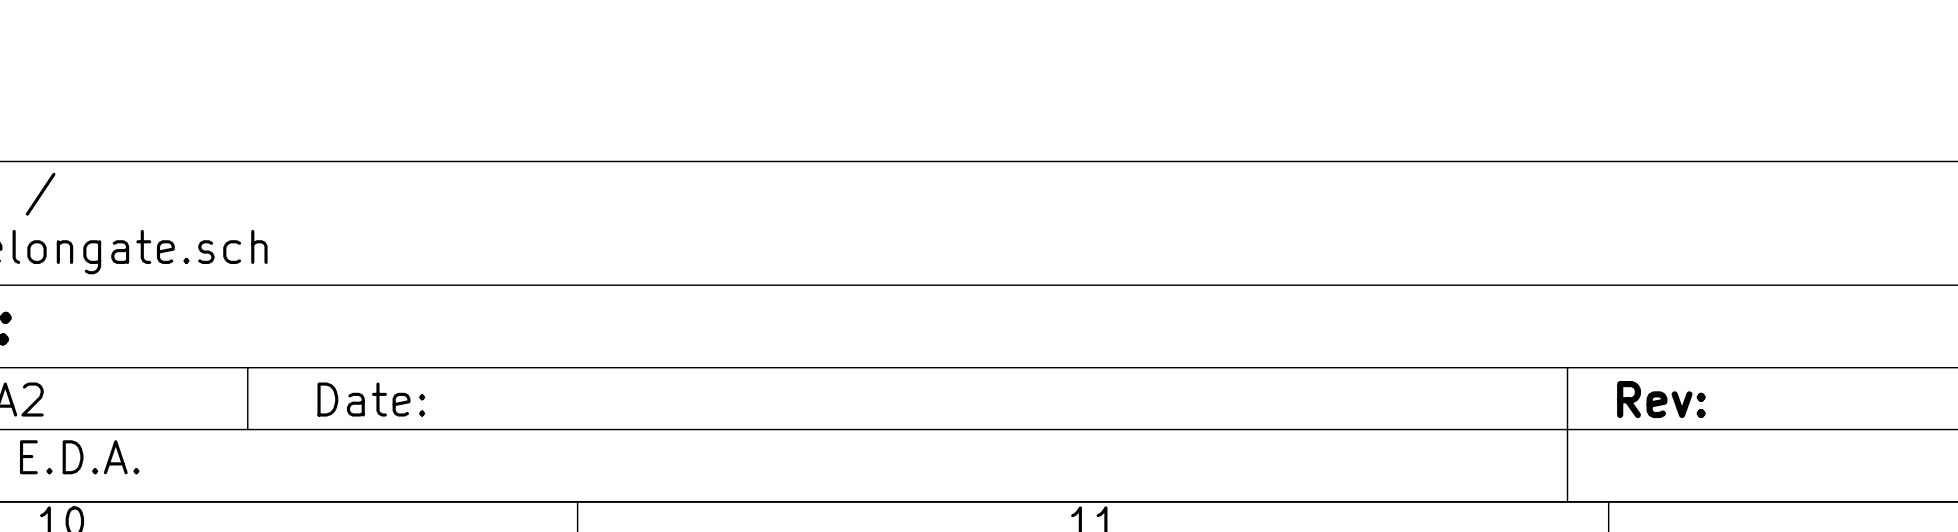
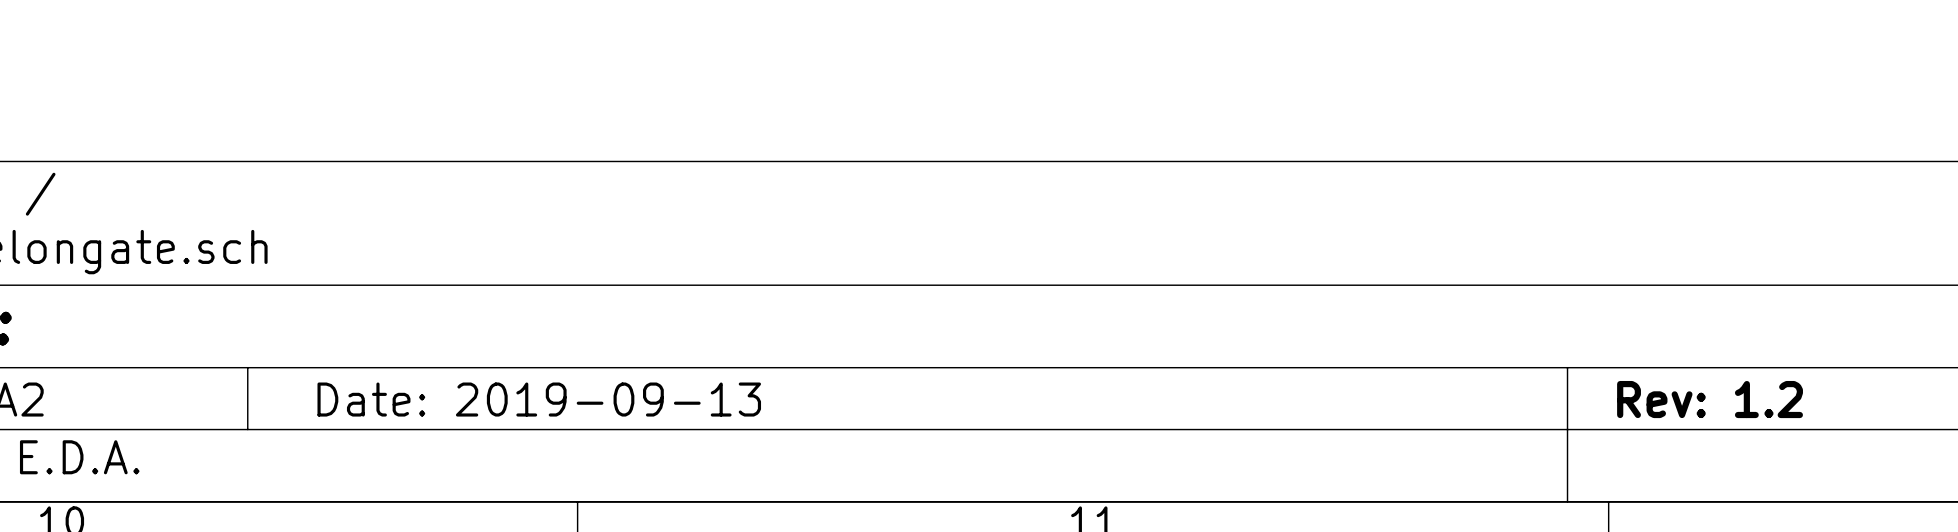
title block: Date: (371, 399) -> Date: 2019-09-13 (539, 399)
title block: Rev: (1661, 399) -> Rev: 1.2 (1710, 399)

